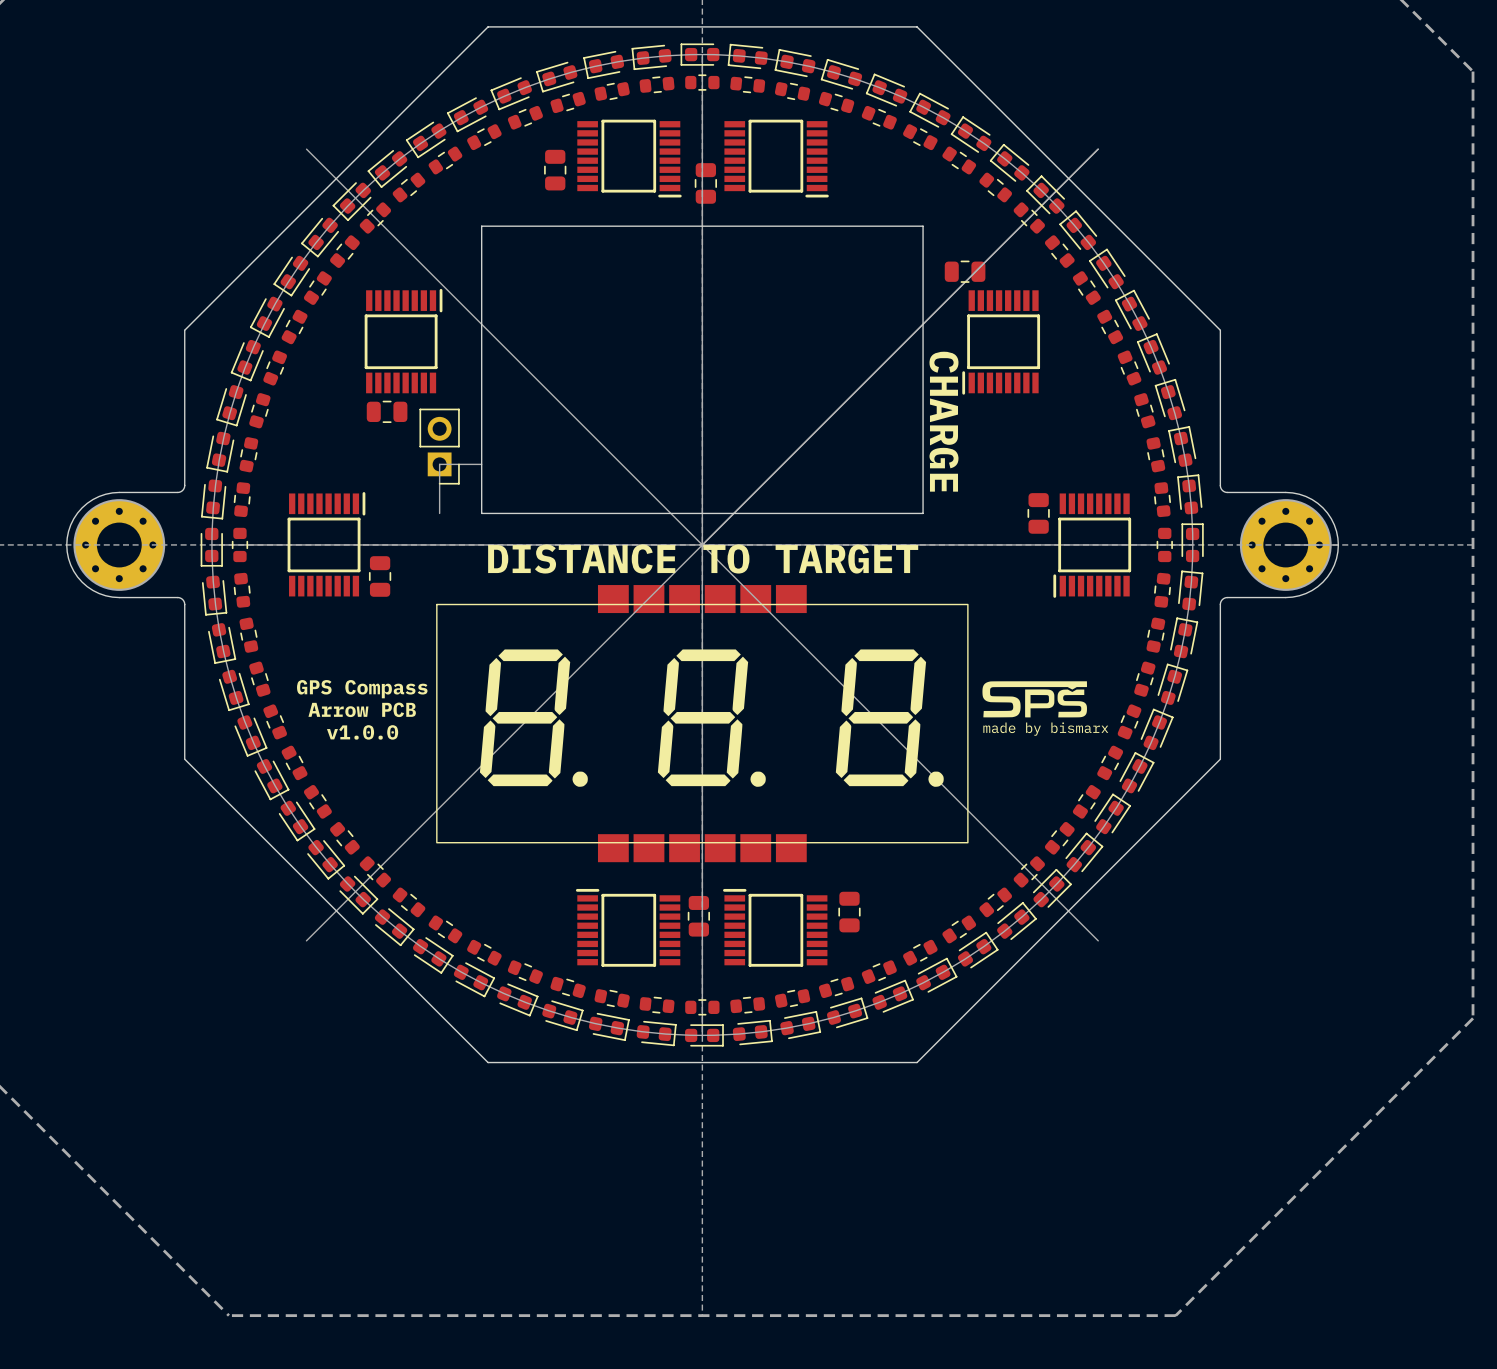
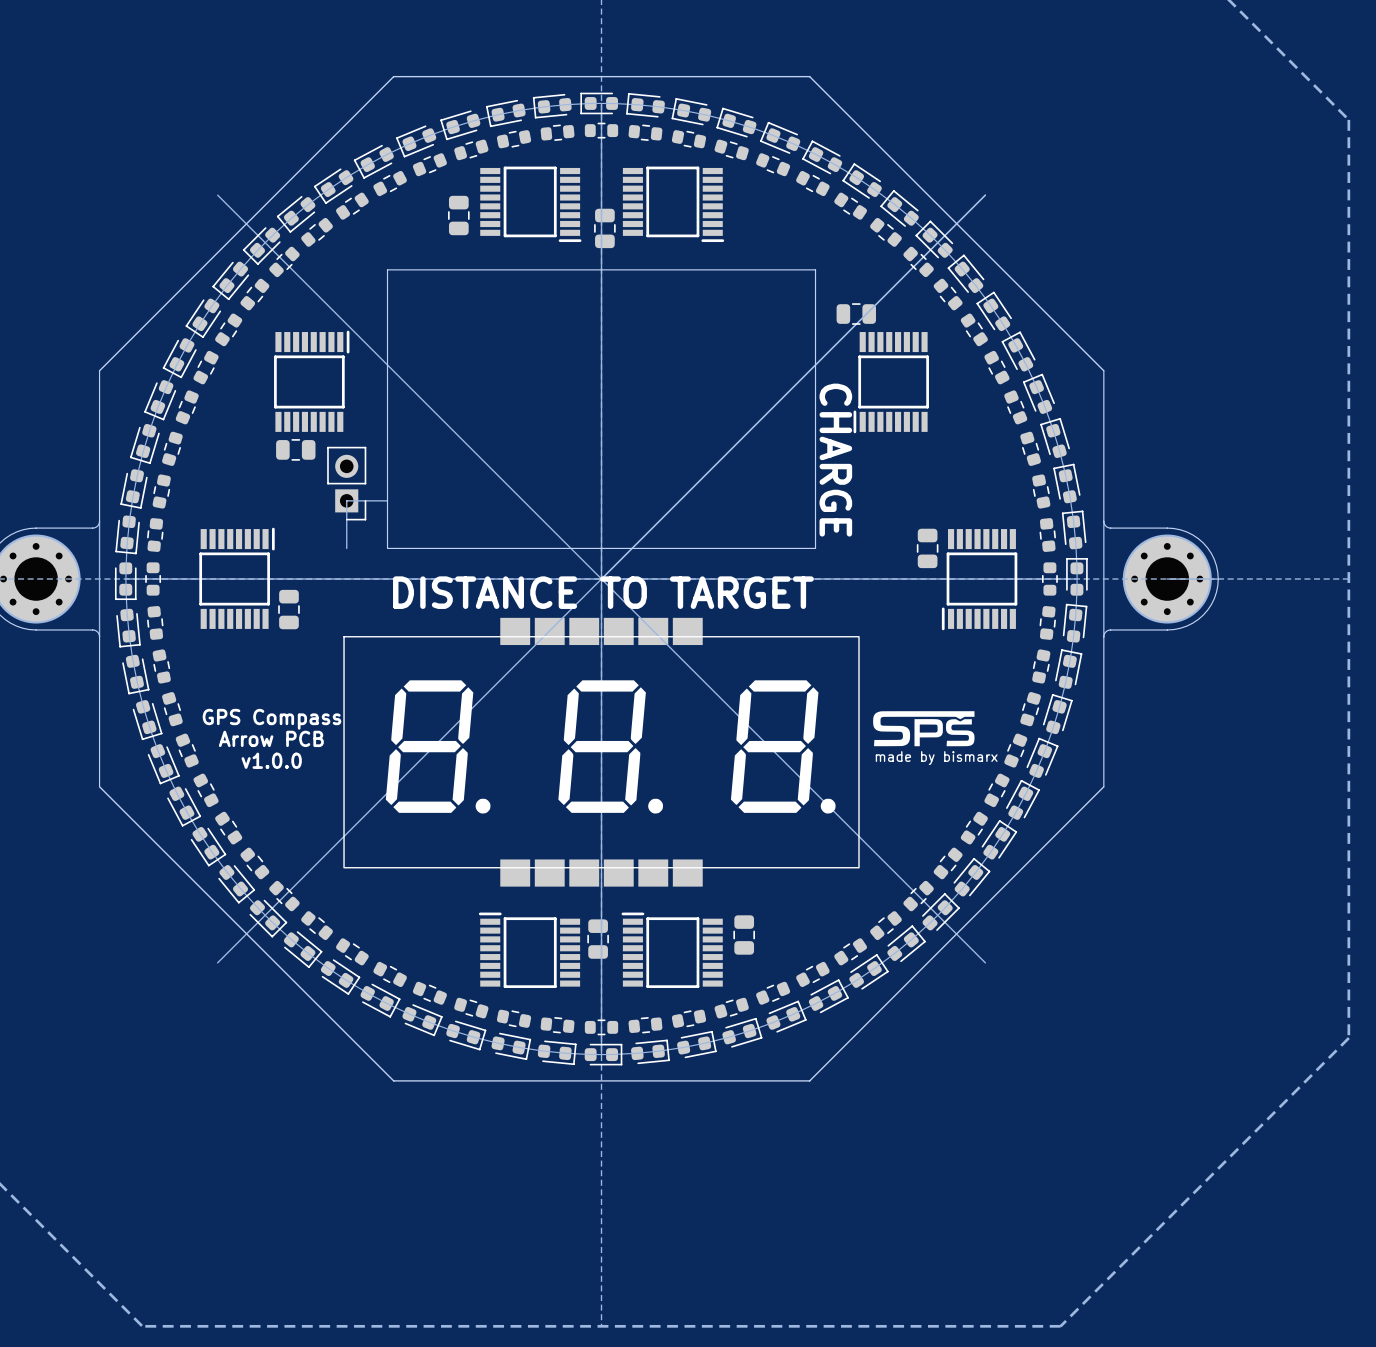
line: none -> (99, 521) (99, 636)
line: none -> (1103, 521) (1103, 636)

